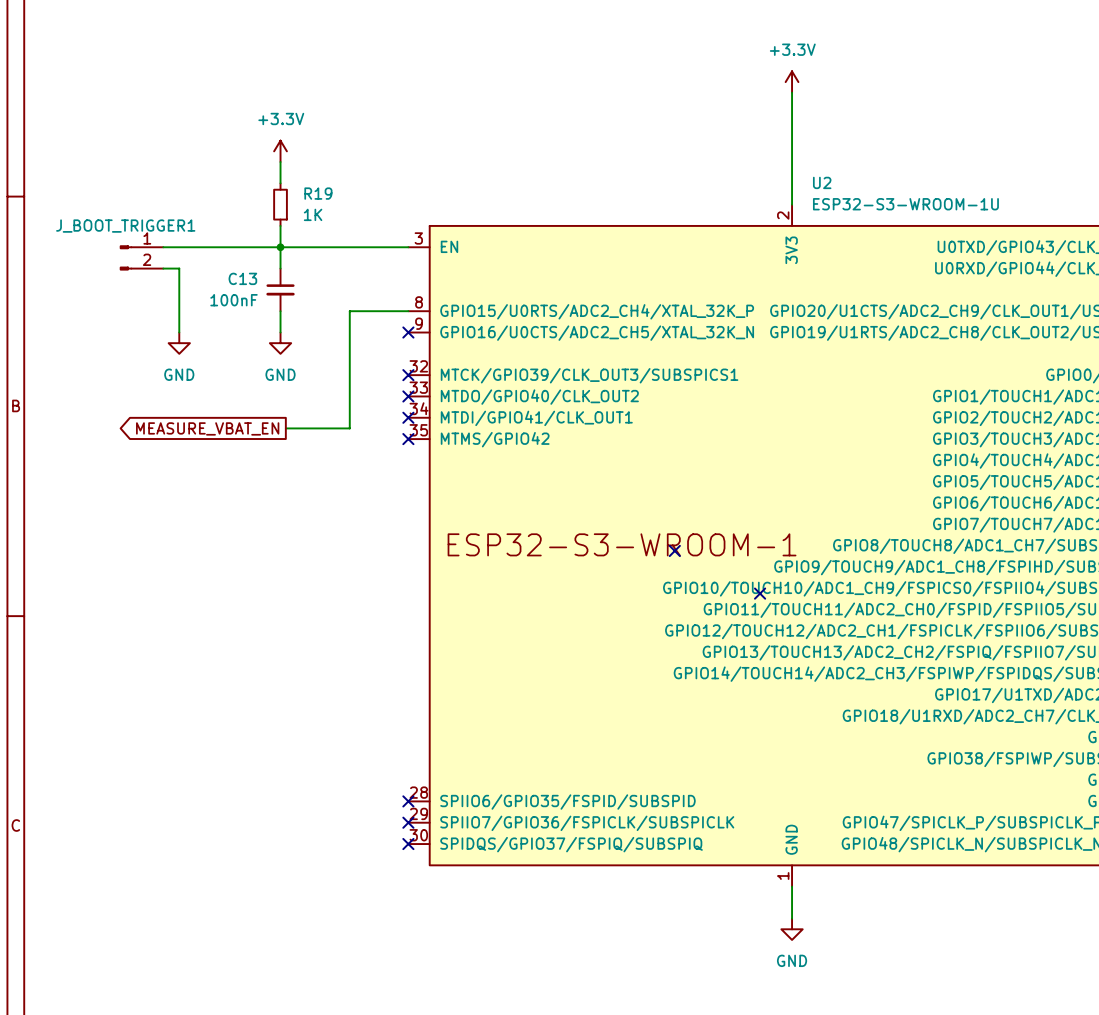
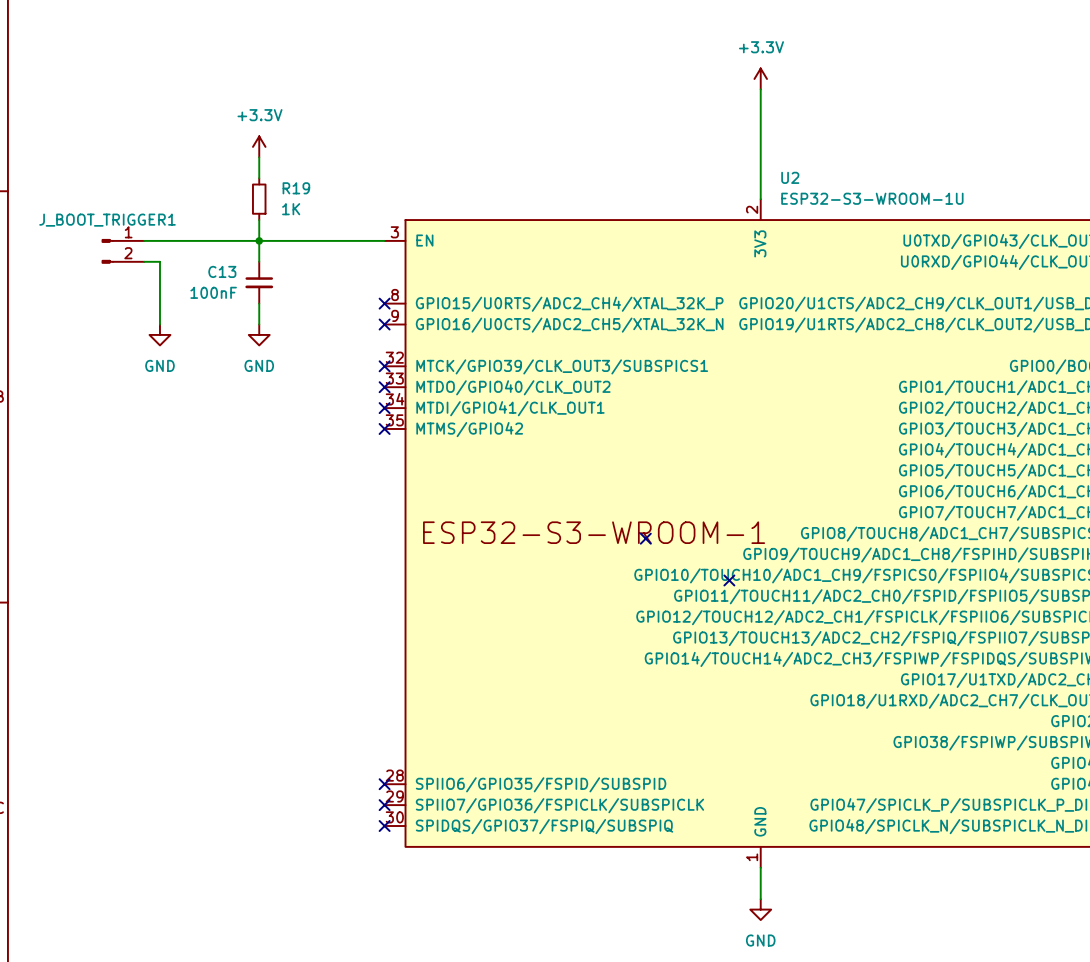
wire: (408, 311) (349, 311) (349, 428) (285, 428) -> none
no-connect mark: none -> (384, 303)
global label: MEASURE_VBAT_EN (207, 428) -> none

